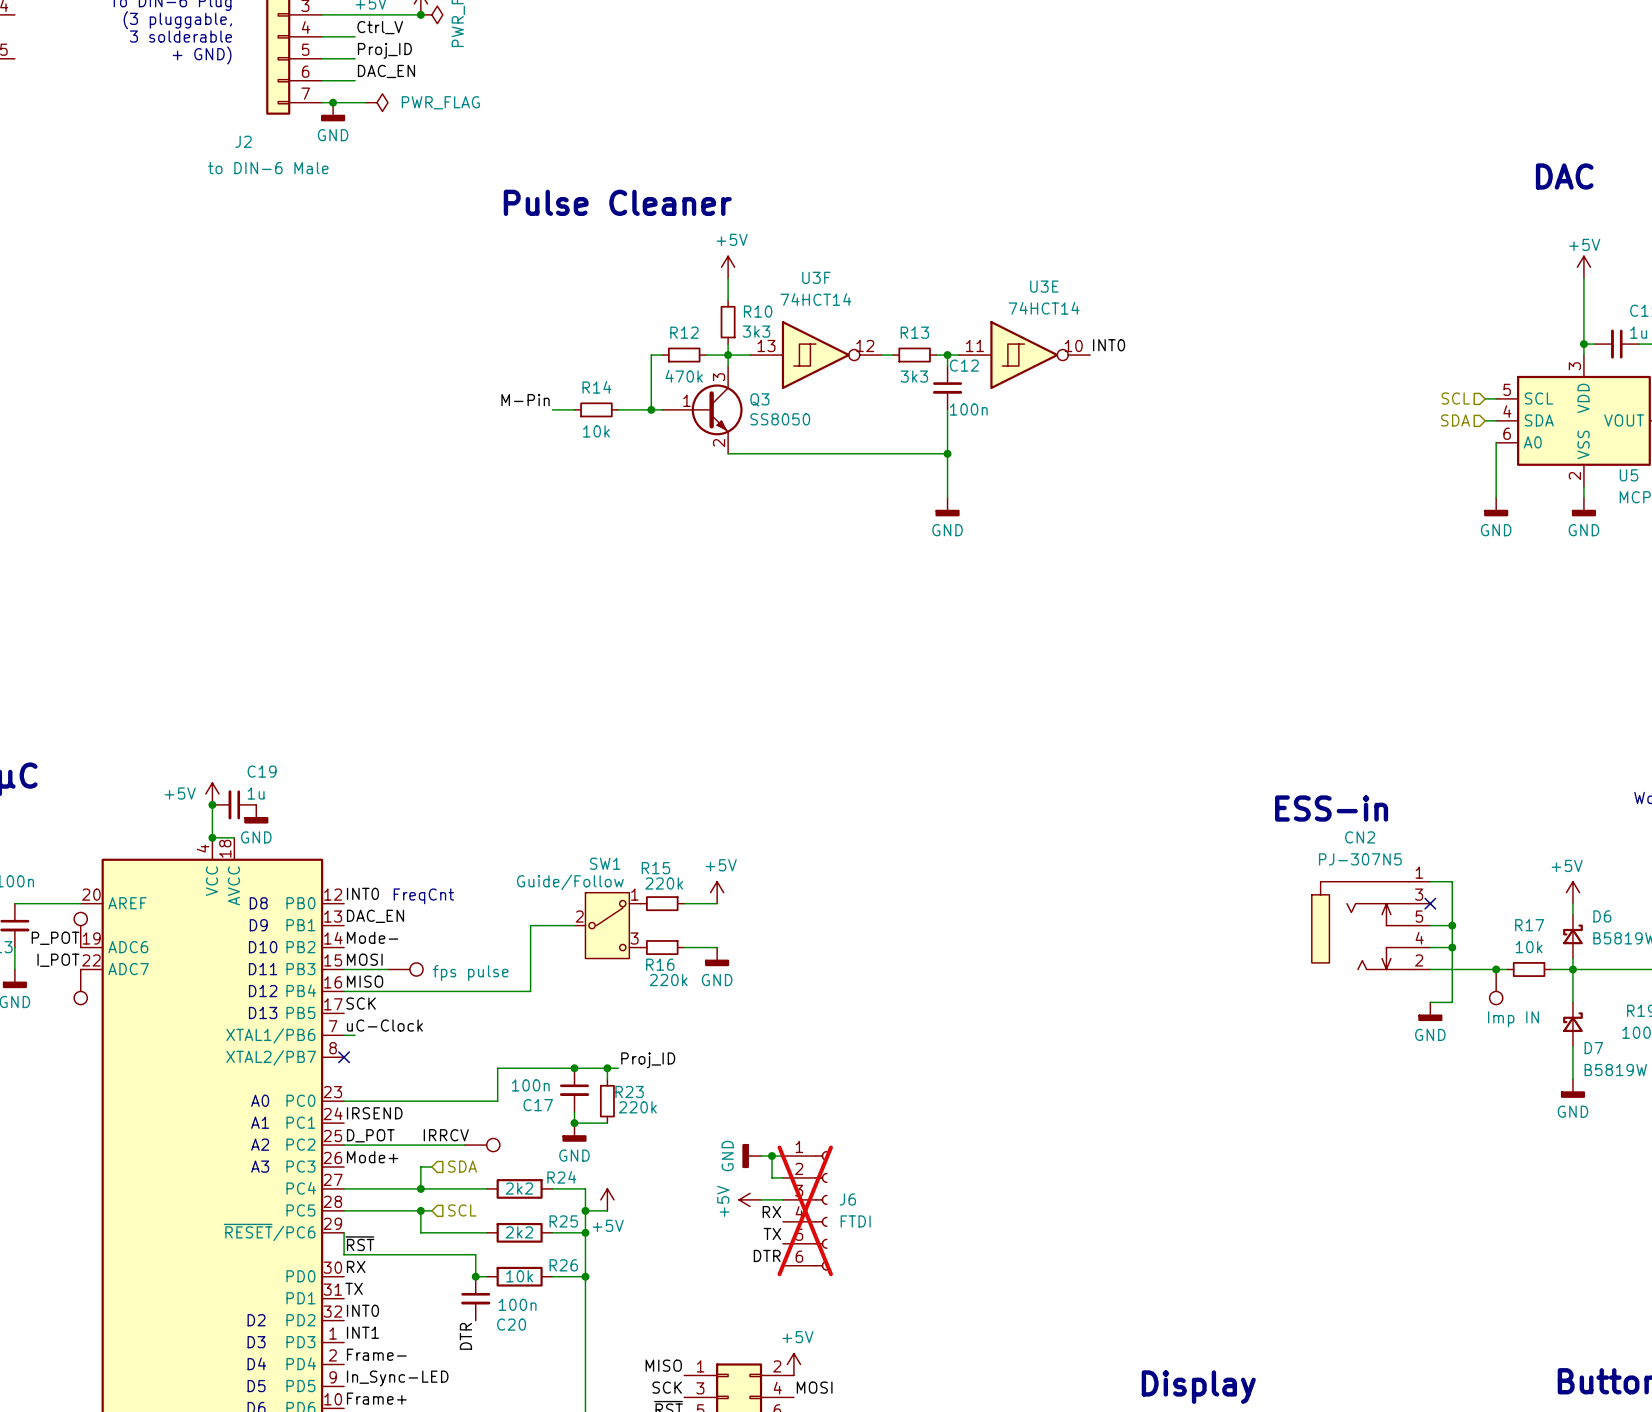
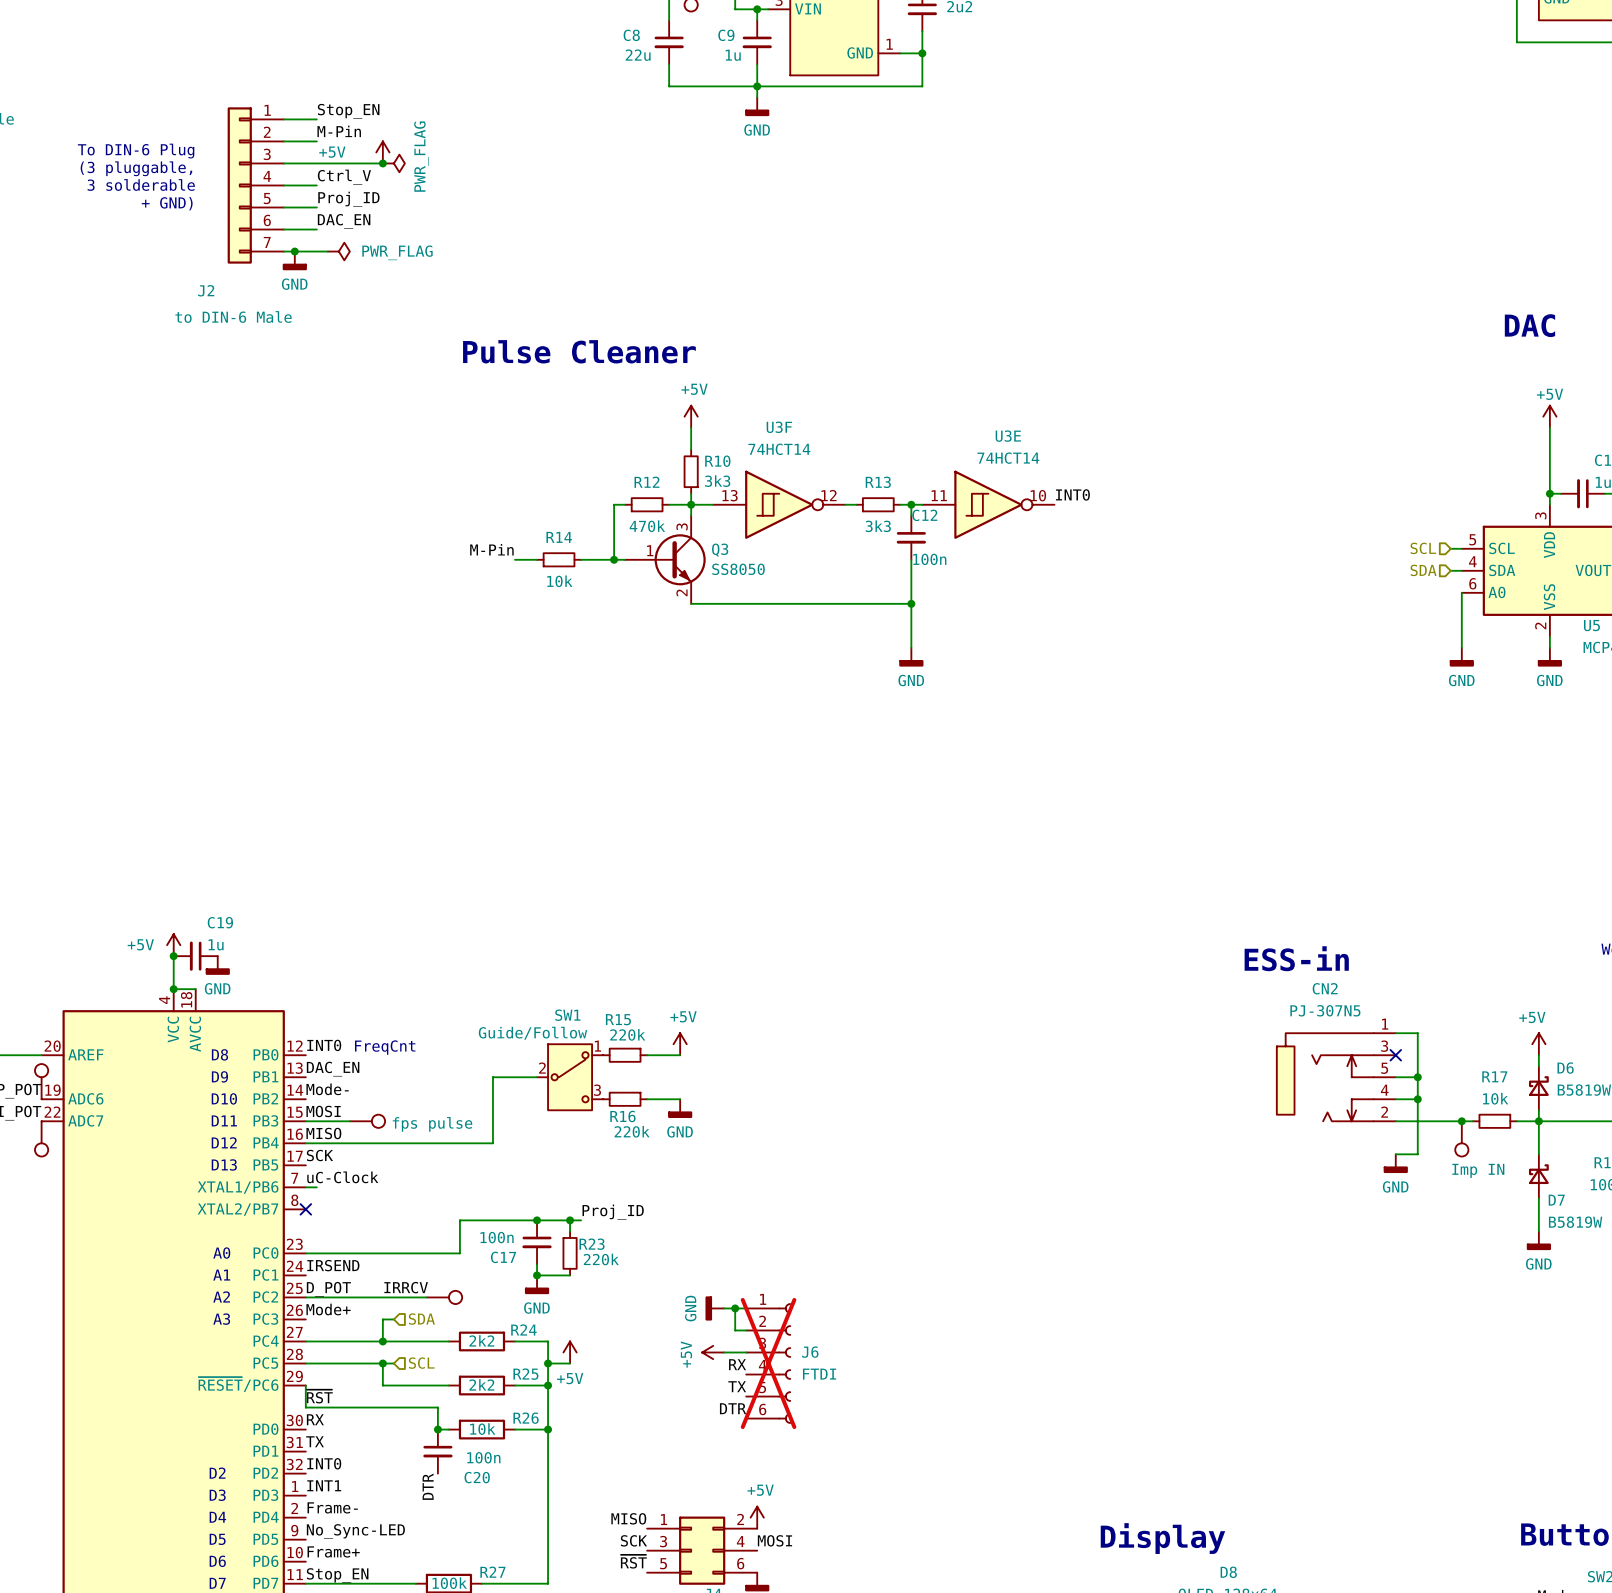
label: In_Sync-LED (397, 1378) -> No_Sync-LED (355, 1531)

